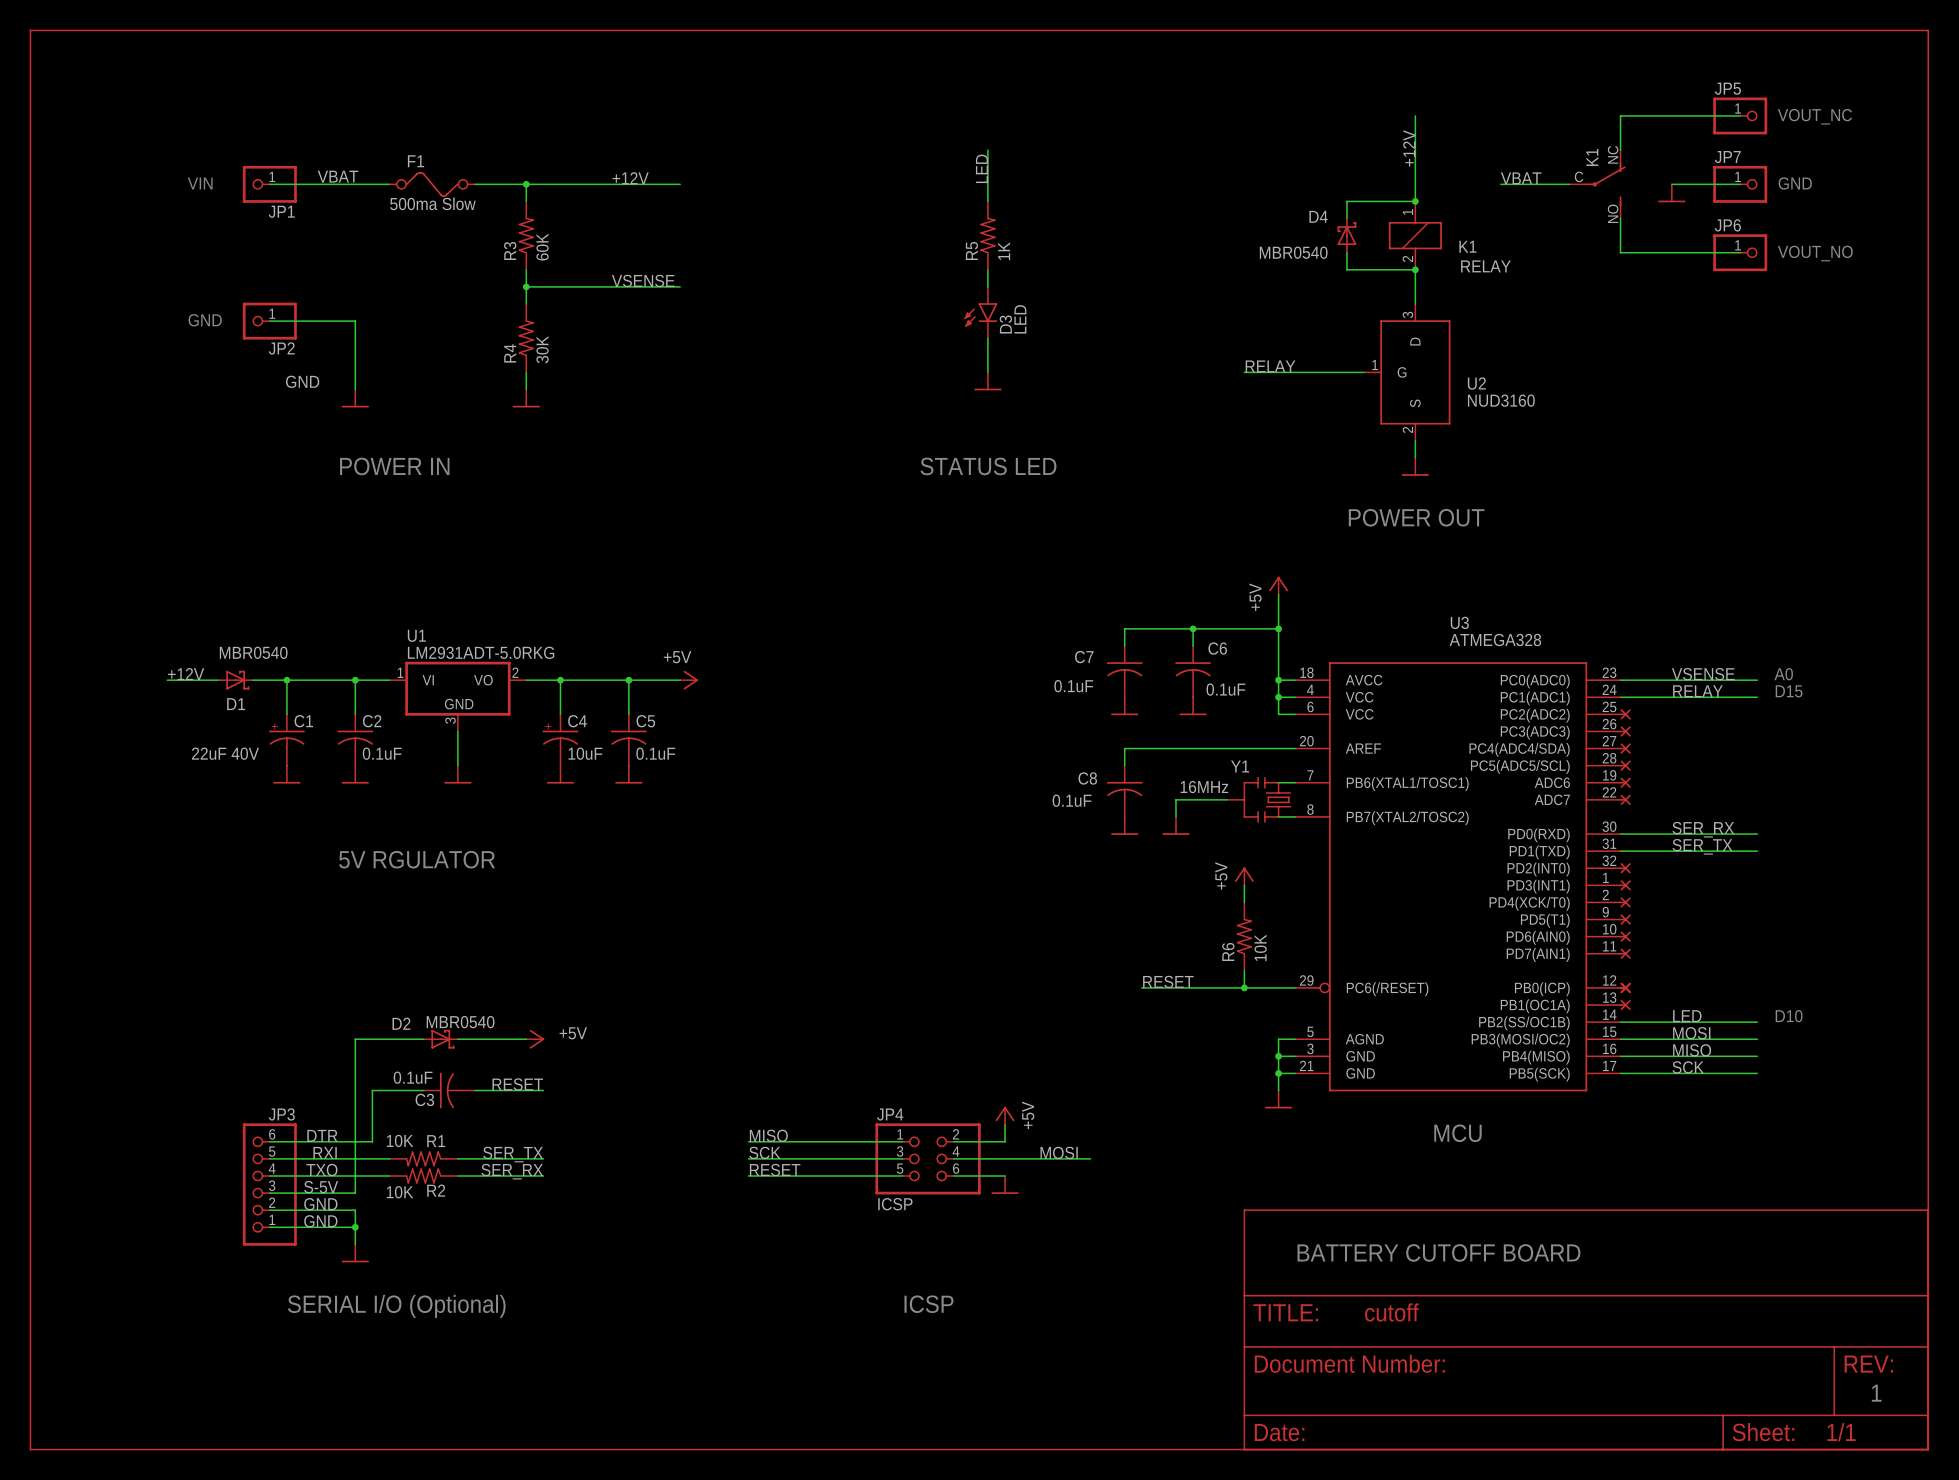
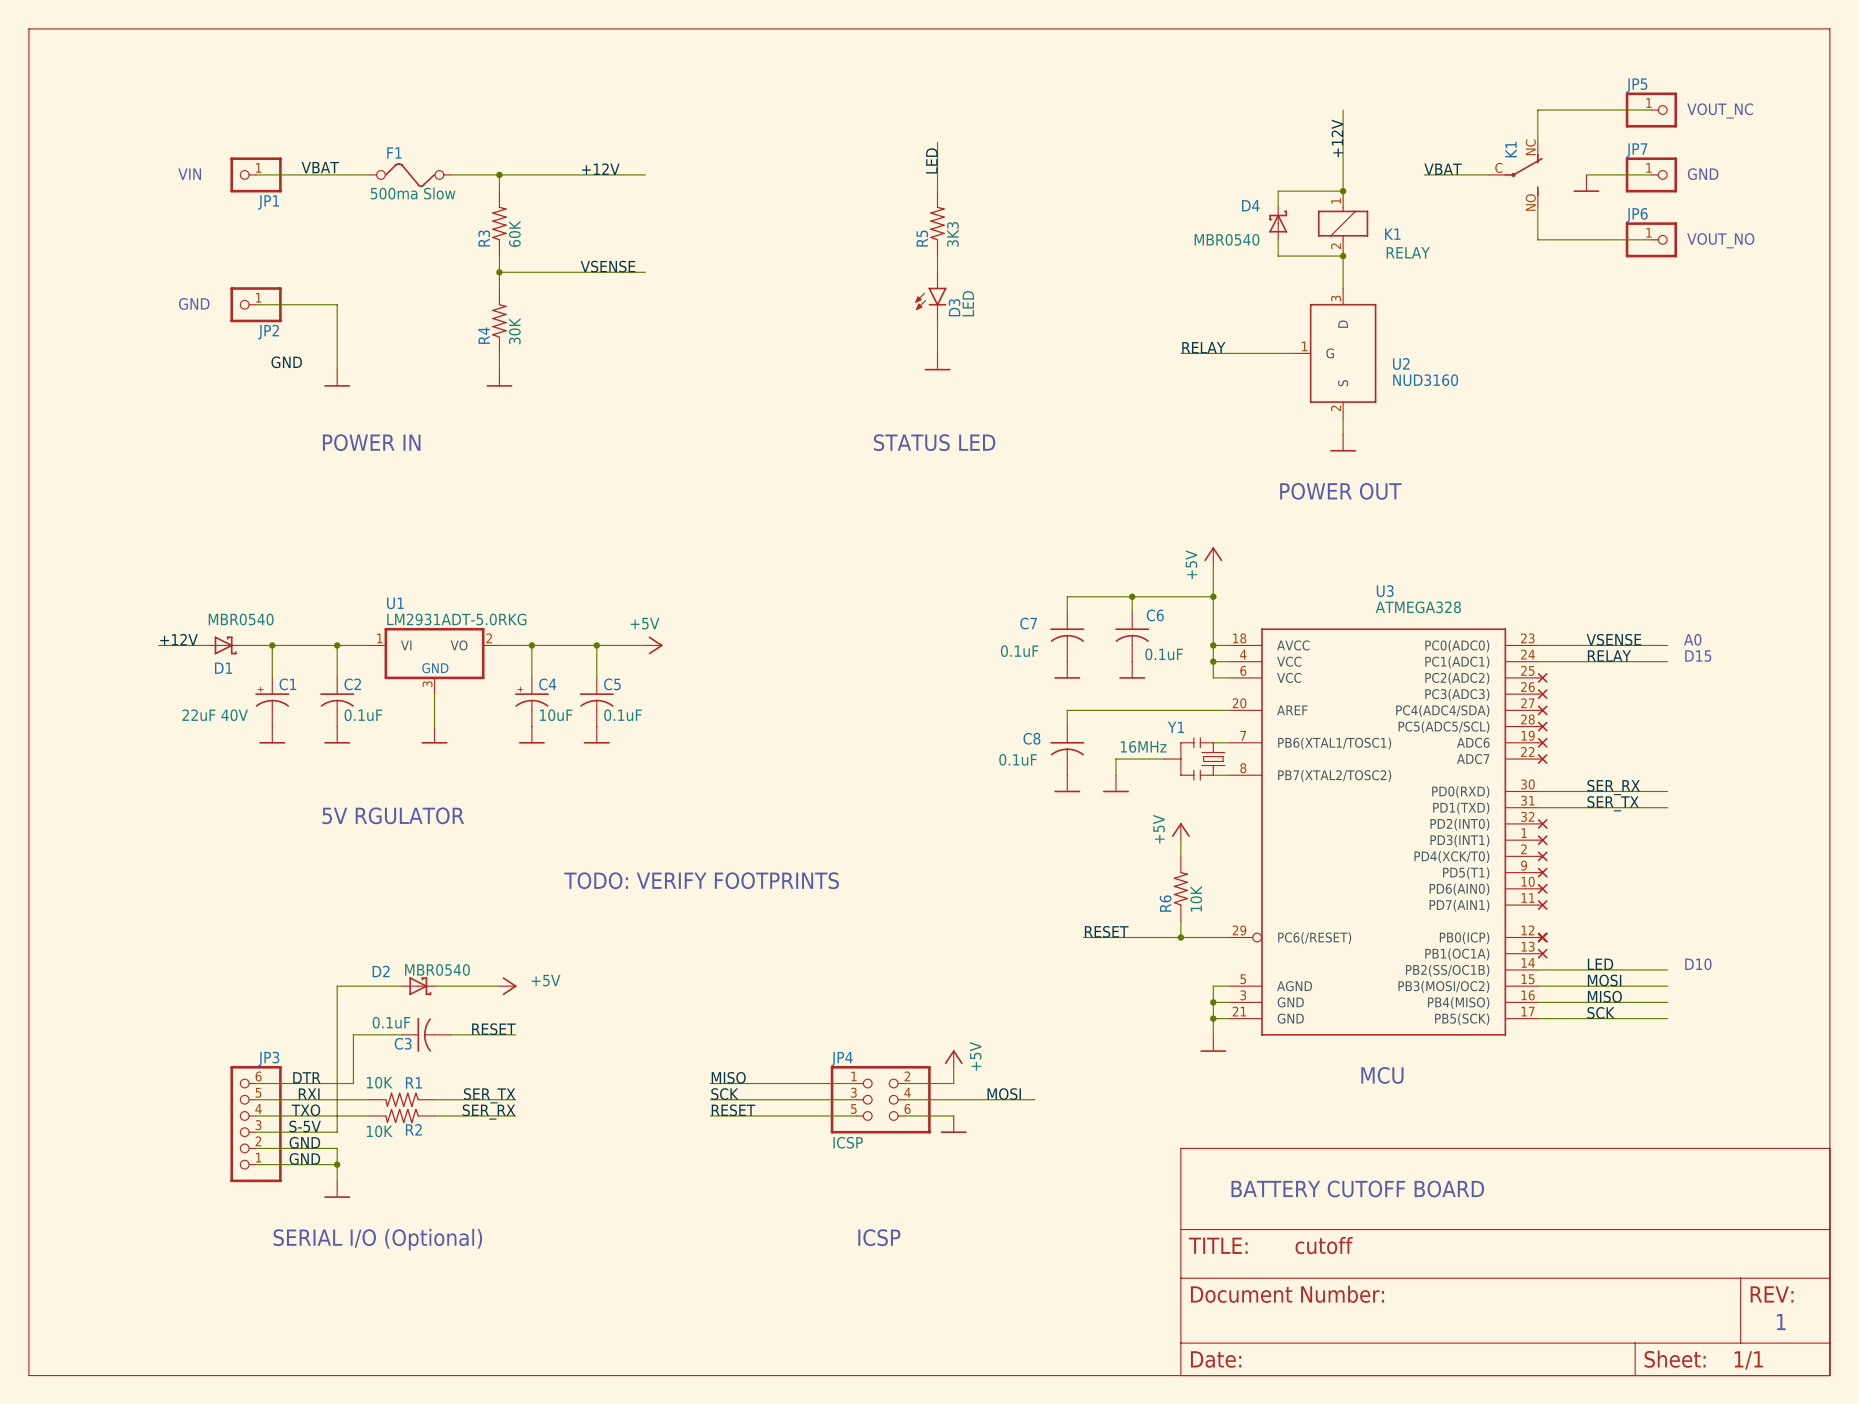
R5 value: 1K (1004, 251) -> 3K3 (952, 234)
text: none -> TODO: VERIFY FOOTPRINTS (701, 880)

